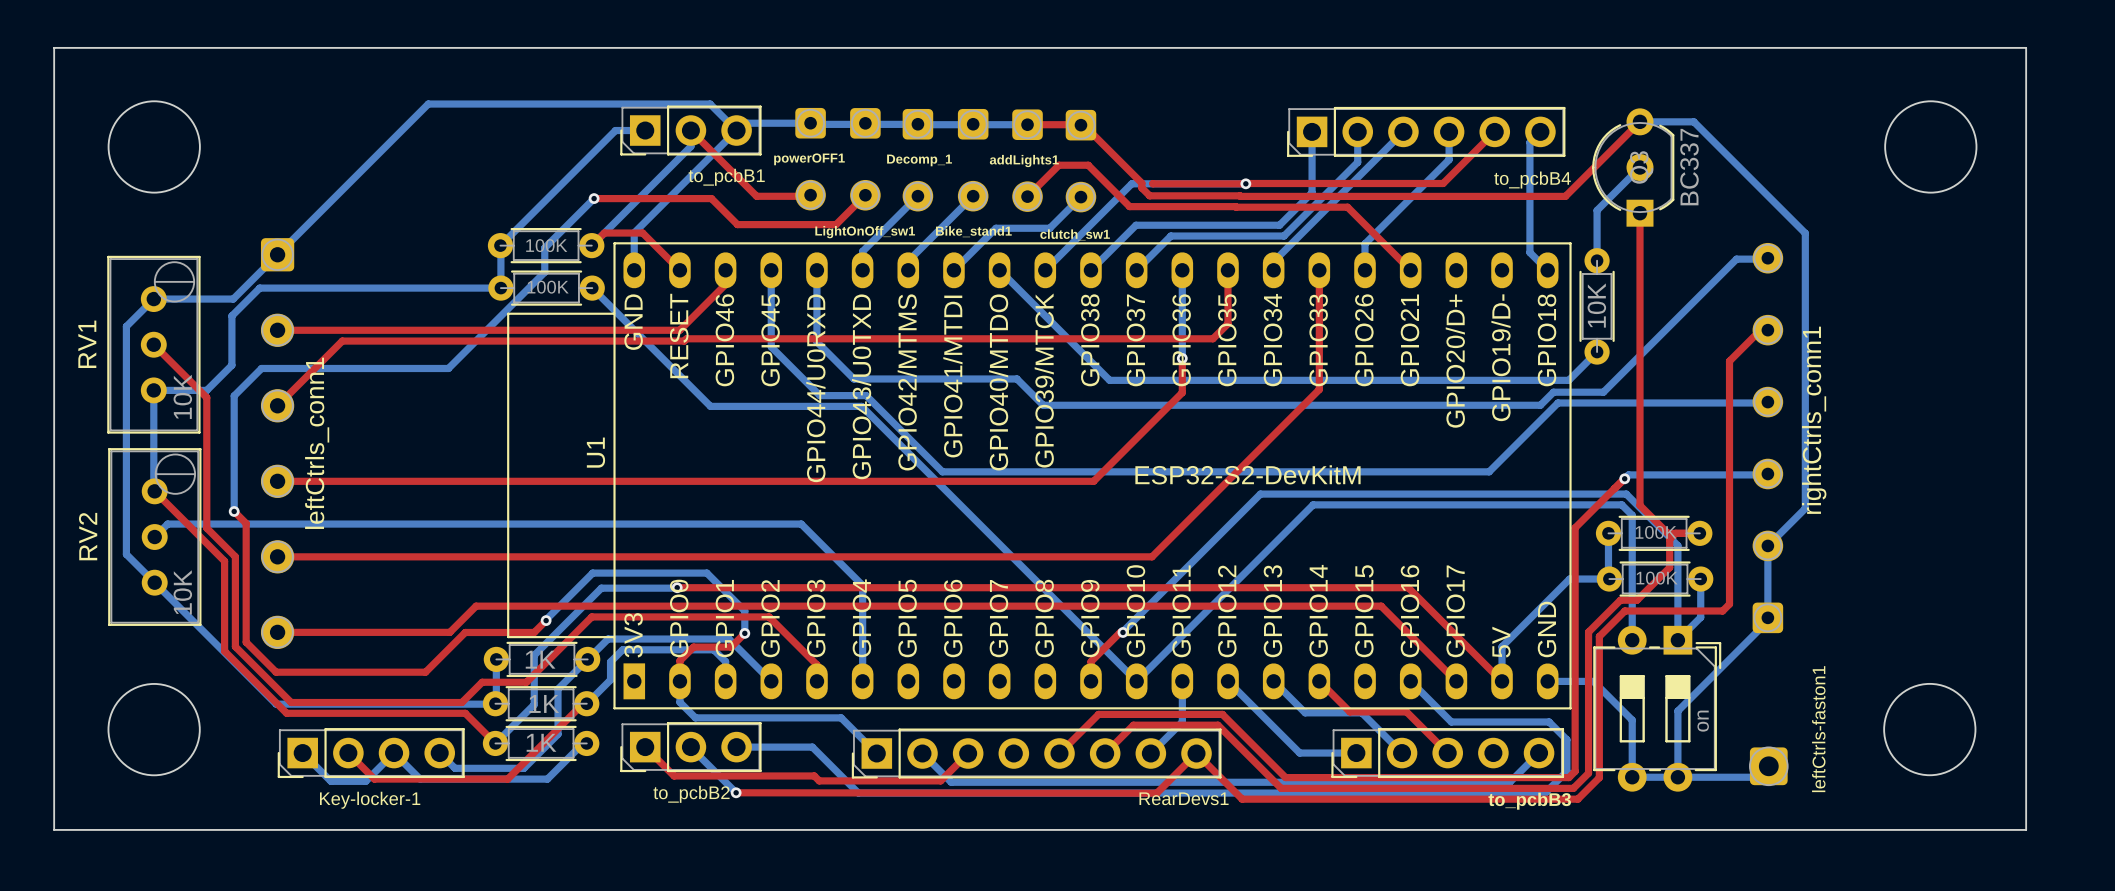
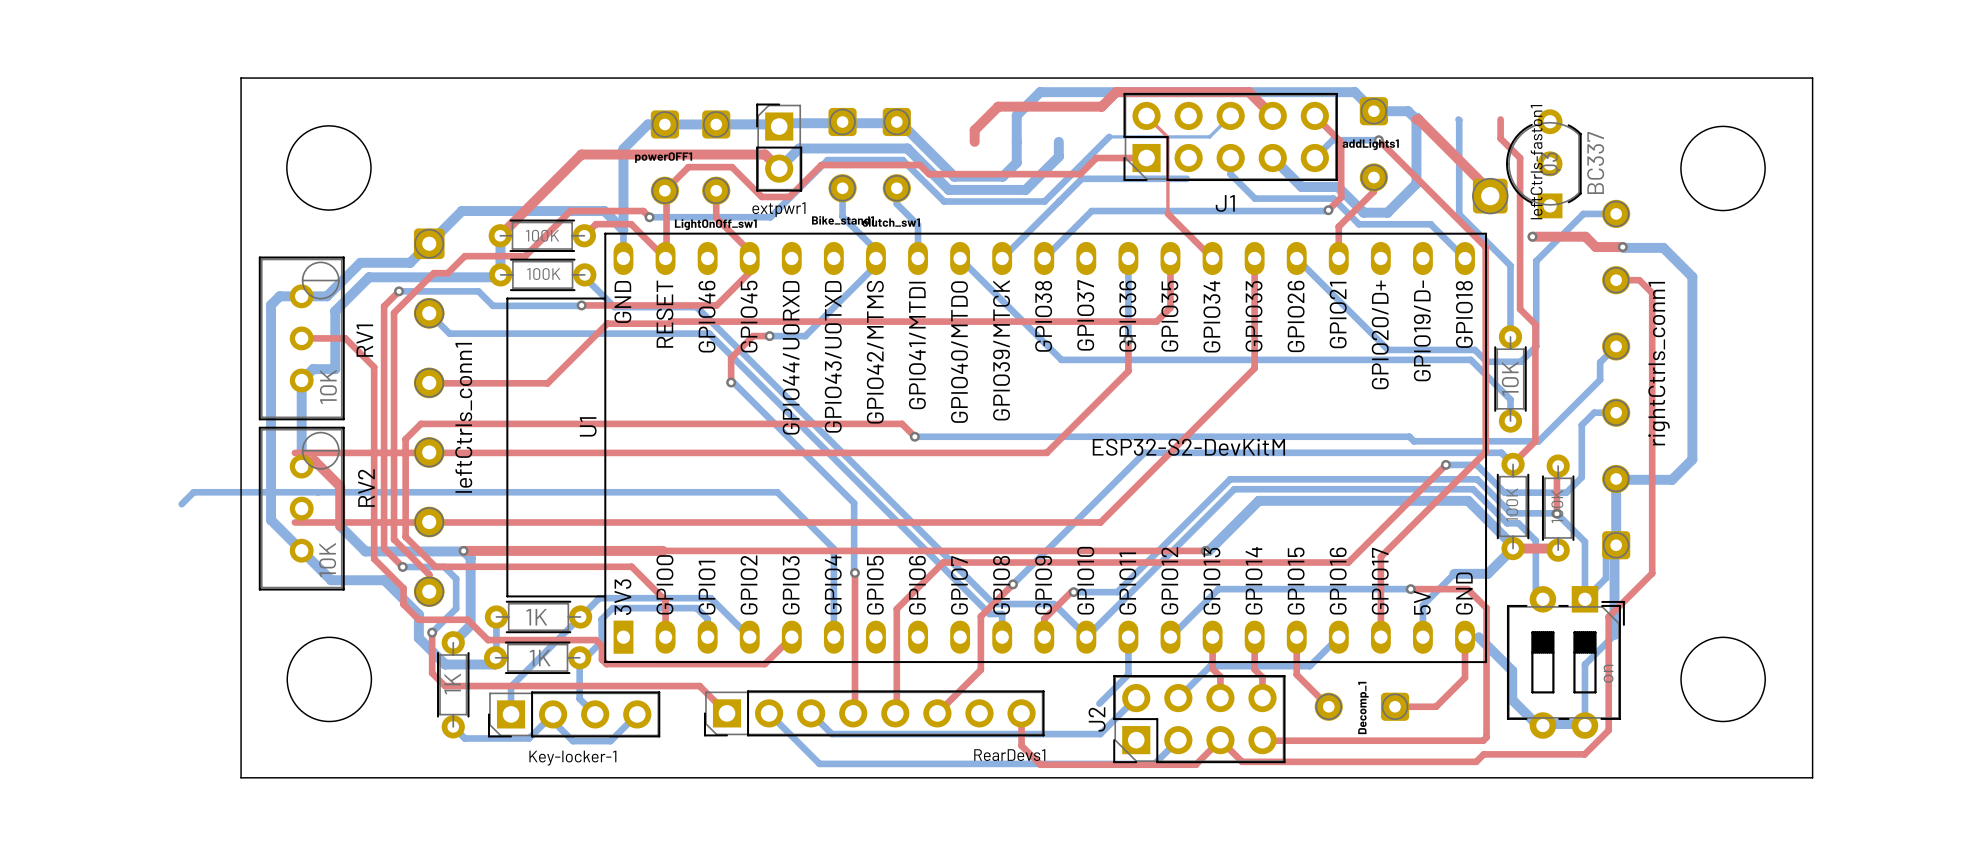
board edge: (54, 47) (2026, 47) (2026, 829) (54, 829) (54, 47) -> (241, 78) (241, 777) (1812, 777) (1812, 78) (241, 78)
top track: none -> (1146, 115) (1167, 137) (1167, 213) (1212, 258)
bottom track: none -> (1230, 115) (1209, 136) (1109, 136) (1044, 201) (944, 201) (902, 160) (827, 160) (770, 217) (649, 217)
top track: none -> (1272, 115) (1248, 92) (1116, 92) (1101, 106) (998, 106) (974, 130) (974, 141)
top track: none -> (1314, 115) (1341, 142) (1341, 197) (1328, 210)
top track: none -> (1416, 119) (1490, 191) (1490, 196)
bottom track: none -> (1458, 119) (1459, 214) (1510, 265) (1510, 336)
top track: none -> (1500, 119) (1500, 138) (1520, 158) (1520, 309) (1535, 324) (1535, 441) (1512, 463)
top track: (1640, 121) (1565, 196) (1149, 195) (1141, 187) (1141, 183) (1083, 124) (1027, 124) -> none
bottom track: (1640, 121) (1693, 121) (1805, 233) (1805, 508) (1767, 545) (1767, 621) (1709, 678) -> (1622, 247) (1663, 247) (1692, 276) (1692, 459) (1672, 479) (1616, 478) (1614, 634)
bottom track: (917, 124) (1027, 124) -> none
bottom track: (645, 130) (615, 130) (500, 245) -> none
top track: (690, 130) (756, 196) (810, 195) -> none
bottom track: (690, 130) (690, 146) (591, 245) -> none
to_pcbB1: (690, 130) -> none
bottom track: (1312, 131) (1312, 192) (1279, 225) (1136, 225) -> (1328, 210) (1091, 211) (1085, 216)
bottom track: (1357, 131) (1357, 162) (1284, 236) (1170, 236) (1136, 270) -> none
bottom track: (1403, 131) (1273, 261) -> none
to_pcbB4: (1426, 131) -> none
bottom track: (1449, 131) (1449, 159) (1365, 243) (1365, 270) -> (1616, 213) (1583, 213) (1536, 261) (1536, 346) (1520, 361) (1486, 361) (1474, 349) (1388, 349) (1296, 258)
top track: (1494, 131) (1443, 183) (1152, 183) -> none
bottom track: (1540, 131) (1529, 142) (1529, 252) -> (1230, 158) (1230, 174) (1255, 198) (1333, 198) (1358, 224) (1430, 224) (1448, 242)
J1: none -> (1230, 136)
bottom track: none -> (1378, 140) (1332, 140) (1314, 158)
via: none -> (1378, 140)
bottom track: none -> (1058, 141) (1058, 156) (1025, 189) (948, 189) (907, 148) (799, 148) (779, 168)
round board edge position: (154, 146) -> (328, 167)
round board edge position: (1930, 146) -> (1723, 168)
extpwr1: none -> (779, 147)
powerOFF1 position: (810, 159) -> (664, 157)
LightOnOff_sw1 position: (865, 159) -> (716, 157)
Decomp_1 rotation: 0° (917, 160) -> 90° clockwise (1361, 706)
Decomp_1 position: (917, 160) -> (1361, 706)
Bike_stand1 position: (973, 160) -> (842, 155)
addLights1 position: (1027, 160) -> (1373, 144)
clutch_sw1 position: (1080, 161) -> (896, 155)
top track: none -> (1146, 158) (1096, 158) (1080, 174) (929, 174) (920, 165) (821, 165) (789, 196) (761, 196) (731, 167) (688, 167) (664, 190) (666, 192) (665, 258)
bottom track: none -> (1272, 158) (1301, 187) (1338, 187) (1363, 212) (1387, 212) (1416, 183) (1416, 118) (1416, 117) (1416, 120) (1408, 111) (1373, 111) (1354, 92) (1040, 92) (1016, 115) (1016, 162) (1002, 176) (954, 176) (899, 121) (782, 123) (779, 126) (777, 124) (647, 124) (623, 148) (623, 224)
bottom track: (1640, 167) (1597, 210) (1597, 260) -> none
top track: none -> (779, 168) (765, 154) (581, 154) (500, 235)
via: (1245, 183) -> none
top track: (865, 195) (836, 224) (737, 224) (711, 198) (594, 198) -> none
top track: none -> (716, 190) (716, 217) (749, 251) (749, 272) (716, 305) (581, 305)
bottom track: (917, 196) (862, 251) (862, 270) -> none
bottom track: (973, 196) (908, 261) -> (842, 188) (842, 216) (875, 250)
top track: (1027, 196) (1058, 165) (1088, 165) (1129, 206) (1347, 207) (1410, 270) -> (1373, 177) (1373, 191) (1338, 226) (1338, 258)
bottom track: (1080, 197) (1049, 228) (995, 228) (953, 270) -> (896, 188) (896, 203) (918, 225) (918, 258)
bottom track: (594, 198) (544, 247) (544, 272) (448, 368) (261, 368) (234, 395) (234, 511) -> none
via: (594, 198) -> none
top track: (1640, 213) (1640, 505) (1667, 533) (1699, 533) -> none
via: none -> (1328, 210)
top track: none -> (649, 217) (643, 211) (570, 211) (525, 256) (464, 256) (447, 273) (433, 273) (394, 312) (394, 539) (429, 574) (429, 591)
via: none -> (649, 217)
bottom track: (634, 232) (736, 130) (710, 104) (428, 104) (233, 299) (153, 299) (126, 326) (126, 554) (276, 704) (496, 702) -> (623, 230) (604, 211) (461, 211) (410, 262) (360, 262) (326, 296) (279, 296) (271, 305) (271, 520) (331, 580) (384, 580) (418, 614) (418, 638) (445, 664) (494, 664) (496, 656)
bottom track: (500, 246) (500, 288) (259, 288) (231, 315) (231, 365) (206, 390) (153, 390) (154, 491) -> (500, 235) (500, 277) (369, 277) (335, 311) (335, 369) (313, 369) (301, 380) (301, 466)
top track: none -> (1532, 236) (1585, 236) (1595, 247) (1622, 247)
via: none -> (1532, 236)
via: none -> (1622, 247)
bottom track: (1767, 258) (1736, 259) (1603, 392) (1553, 392) (1540, 405) (1043, 405) (1016, 378) (853, 378) (816, 341) (816, 270) -> none
bottom track: (771, 270) (771, 346) (819, 395) (866, 395) (942, 471) (1489, 471) (1557, 402) (1767, 402) -> none
bottom track: none -> (875, 258) (875, 265) (805, 336) (769, 336)
top track: (725, 284) (679, 330) (277, 330) -> none
bottom track: (592, 288) (710, 406) (861, 406) (1136, 681) -> (584, 277) (614, 307) (696, 307) (993, 604) (1054, 604) (1086, 637)
top track: none -> (1616, 280) (1639, 280) (1652, 293) (1652, 573) (1608, 616) (1608, 730) (1584, 754) (1483, 754) (1476, 761) (1242, 761) (1220, 740) (1195, 764) (1040, 764) (1021, 745) (1021, 713)
top track: none -> (399, 291) (384, 306) (384, 548) (402, 566)
bottom track: none -> (399, 291) (478, 291) (493, 305) (581, 305)
via: none -> (399, 291)
part position: (1597, 306) -> (1510, 379)
via: none -> (581, 305)
bottom track: none -> (429, 313) (449, 333) (709, 333) (989, 613) (1002, 613) (1002, 637)
top track: (1767, 330) (1759, 331) (1729, 361) (1729, 604) (1722, 611) (1624, 611) (1599, 636) (1599, 777) (1577, 799) (1242, 799) (1196, 753) (1156, 793) (735, 793) -> none
top track: (616, 341) (342, 341) (277, 405) -> (607, 323) (547, 383) (429, 382)
RV1 name position: RV1 (87, 344) -> RV1 (364, 340)
top track: (153, 344) (206, 397) (206, 528) (235, 556) (235, 646) (291, 702) (461, 702) (482, 682) (526, 682) (591, 616) (769, 616) (816, 664) (816, 680) -> none
RV1 position: (153, 344) -> (301, 338)
bottom track: (1597, 352) (1568, 380) (1554, 380) -> (1510, 421) (1510, 399) (1470, 359)
top track: none -> (769, 336) (753, 336) (731, 358) (731, 382)
via: none -> (769, 336)
top track: none -> (301, 338) (345, 338) (374, 367) (374, 558) (403, 588) (403, 604) (418, 619) (467, 619) (488, 640) (596, 640) (601, 645) (601, 659) (606, 664) (764, 664) (791, 637)
bottom track: none -> (1616, 346) (1600, 362) (1600, 379) (1538, 441) (1413, 441) (1409, 436) (914, 436)
bottom track: none -> (731, 382) (733, 382) (854, 503) (854, 572)
via: none -> (731, 382)
bottom track: none -> (1616, 412) (1594, 412) (1581, 425) (1581, 477) (1566, 492) (1504, 492) (1476, 464) (1445, 464)
rightCtrls_conn1 position: (1767, 438) -> (1616, 379)
leftCtrls_conn1 position: (277, 443) -> (429, 417)
RV2 footprint: [108, 448, 202, 626] -> [258, 426, 345, 591]
via: none -> (914, 436)
bottom track: (1767, 474) (1628, 474) (1624, 478) -> none
via: (1624, 478) -> none
top track: (1614, 488) (1614, 488) (1624, 478) (1624, 478) (1575, 527) (1575, 771) (1568, 777) (1285, 777) (1222, 714) (1098, 714) (1059, 753) -> none
top track: (154, 491) (224, 561) (224, 651) (286, 713) (465, 713) (495, 743) -> none
bottom track: none -> (1513, 464) (1501, 452) (1144, 452) (1012, 585)
top track: none -> (1445, 464) (1348, 562) (943, 562) (896, 609) (895, 713)
via: none -> (1445, 464)
top track: none -> (1558, 466) (1556, 513)
top track: none -> (301, 466) (307, 461) (314, 461) (340, 486) (340, 526)
top track: (234, 511) (246, 523) (246, 642) (276, 672) (425, 672) (465, 632) (534, 632) (546, 620) -> none
via: (234, 511) -> none
bottom track: (1297, 520) (1313, 504) (1621, 504) (1632, 515) (1632, 640) -> (1234, 489) (1473, 489) (1507, 523) (1518, 523) (1535, 540) (1536, 597)
bottom track: (1608, 533) (1609, 579) (1569, 579) (1536, 612) -> (1205, 550) (1208, 550) (1258, 500) (1468, 500) (1513, 545) (1513, 548) (1487, 573) (1454, 573)
part rotation: 0° (1654, 533) -> 90° clockwise (1558, 508)
top track: (1675, 533) (1669, 539) (1669, 567) (1637, 600) (1620, 600) (1588, 632) (1588, 773) (1573, 788) (1281, 788) (1217, 725) (1133, 725) (1105, 753) -> none
RV2 name position: RV2 (88, 536) -> RV2 (366, 488)
via: none -> (1556, 513)
bottom track: none -> (340, 526) (365, 551) (463, 550) (470, 557) (470, 625) (453, 642)
bottom track: (1677, 577) (1677, 545) (1626, 494) (1260, 494) (1123, 631) -> (1584, 541) (1556, 513) (1511, 513) (1477, 479) (1230, 479) (1117, 592) (1073, 592)
part rotation: 0° (1655, 579) -> 90° clockwise (1513, 506)
top track: none -> (1513, 548) (1556, 548) (1558, 550)
top track: none -> (463, 550) (663, 550)
via: none -> (463, 550)
bottom track: (677, 587) (601, 588) (534, 655) (534, 704) (495, 743) -> none
via: (677, 587) -> none
top track: (1266, 587) (1408, 587) (1502, 681) -> none
via: none -> (1205, 550)
bottom track: none -> (402, 566) (444, 566) (456, 578) (456, 608) (432, 632)
via: none -> (402, 566)
top track: none -> (854, 572) (854, 711) (853, 713)
via: none -> (854, 572)
bottom track: (546, 620) (592, 573) (706, 573) (744, 611) (744, 633) -> none
via: (546, 620) -> none
top track: none -> (1012, 584) (980, 616) (980, 669) (937, 713)
via: none -> (1012, 584)
top track: none -> (1410, 589) (1467, 589) (1486, 608) (1486, 737) (1483, 740) (1262, 740)
via: none -> (1410, 589)
top track: (277, 632) (449, 632) (476, 606) (1381, 606) (1456, 681) -> (1378, 140) (1485, 247) (1485, 452) (1380, 556) (1380, 637)
top track: (744, 633) (731, 647) (693, 647) (679, 660) -> (914, 436) (902, 423) (420, 423) (405, 439) (405, 536) (435, 566) (631, 566) (665, 600) (665, 618)
via: (744, 633) -> none
top track: none -> (432, 632) (432, 673) (445, 686) (699, 686) (727, 713)
via: none -> (432, 632)
bottom track: (610, 679) (586, 703) -> (601, 635) (601, 641) (579, 663) (579, 698) (595, 714)
bottom track: (679, 681) (679, 702) (695, 717) (841, 717) (876, 753) -> none
bottom track: (1228, 681) (1299, 753) (1356, 753) -> (1170, 637) (1218, 589) (1410, 589)
top track: none -> (1212, 637) (1212, 668) (1220, 676) (1220, 698)
bottom track: (1273, 681) (1305, 712) (1361, 712) (1402, 753) -> none
top track: (1319, 681) (1349, 711) (1406, 711) (1447, 753) -> (1254, 637) (1254, 669) (1262, 677) (1262, 698)
top track: none -> (1296, 637) (1296, 674) (1328, 706)
bottom track: (1410, 681) (1451, 721) (1549, 721) (1566, 739) (1566, 771) (1545, 793) (858, 793) (812, 747) (736, 747) -> (1338, 637) (1309, 666) (1210, 666) (1178, 698)
top track: none -> (1465, 637) (1465, 677) (1436, 706) (1395, 706)
bottom track: (1562, 681) (1593, 681) (1632, 720) (1632, 777) (1757, 777) (1768, 766) -> (1478, 637) (1512, 670) (1512, 699) (1536, 724) (1578, 724) (1584, 717)
bottom track: (558, 689) (558, 734) (524, 768) (455, 768) (439, 753) -> (553, 644) (511, 686) (511, 714) (515, 714)
top track: (586, 703) (583, 703) (507, 779) (374, 779) (348, 753) -> none
round board edge position: (154, 729) -> (329, 679)
round board edge position: (1929, 729) -> (1723, 679)
part rotation: 0° (541, 743) -> 90° clockwise (453, 684)
part position: (541, 743) -> (453, 684)
bottom track: (586, 743) (583, 743) (547, 779) (420, 779) (394, 753) (365, 781) (331, 781) (302, 753) -> none
top track: (645, 747) (674, 775) (814, 775) (819, 780) (940, 780) (968, 753) -> none
bottom track: (690, 747) (736, 792) -> none
to_pcbB2: (690, 747) -> none
bottom track: none -> (1136, 698) (1100, 734) (831, 734) (811, 713)
Key-locker-1 position: (371, 753) -> (574, 714)
RearDevs1 position: (1036, 753) -> (874, 713)
to_pcbB3: (1447, 753) -> none
bottom track: (1539, 753) (1509, 782) (951, 782) (922, 753) -> none
bottom track: none -> (769, 713) (819, 763) (1154, 763) (1178, 740)
bottom track: none -> (637, 714) (610, 741) (572, 741) (553, 721) (553, 714) (529, 738) (464, 738) (453, 726)
leftCtrls-faston1 position: (1768, 766) -> (1490, 196)
J2: none -> (1199, 719)
via: (736, 792) -> none

